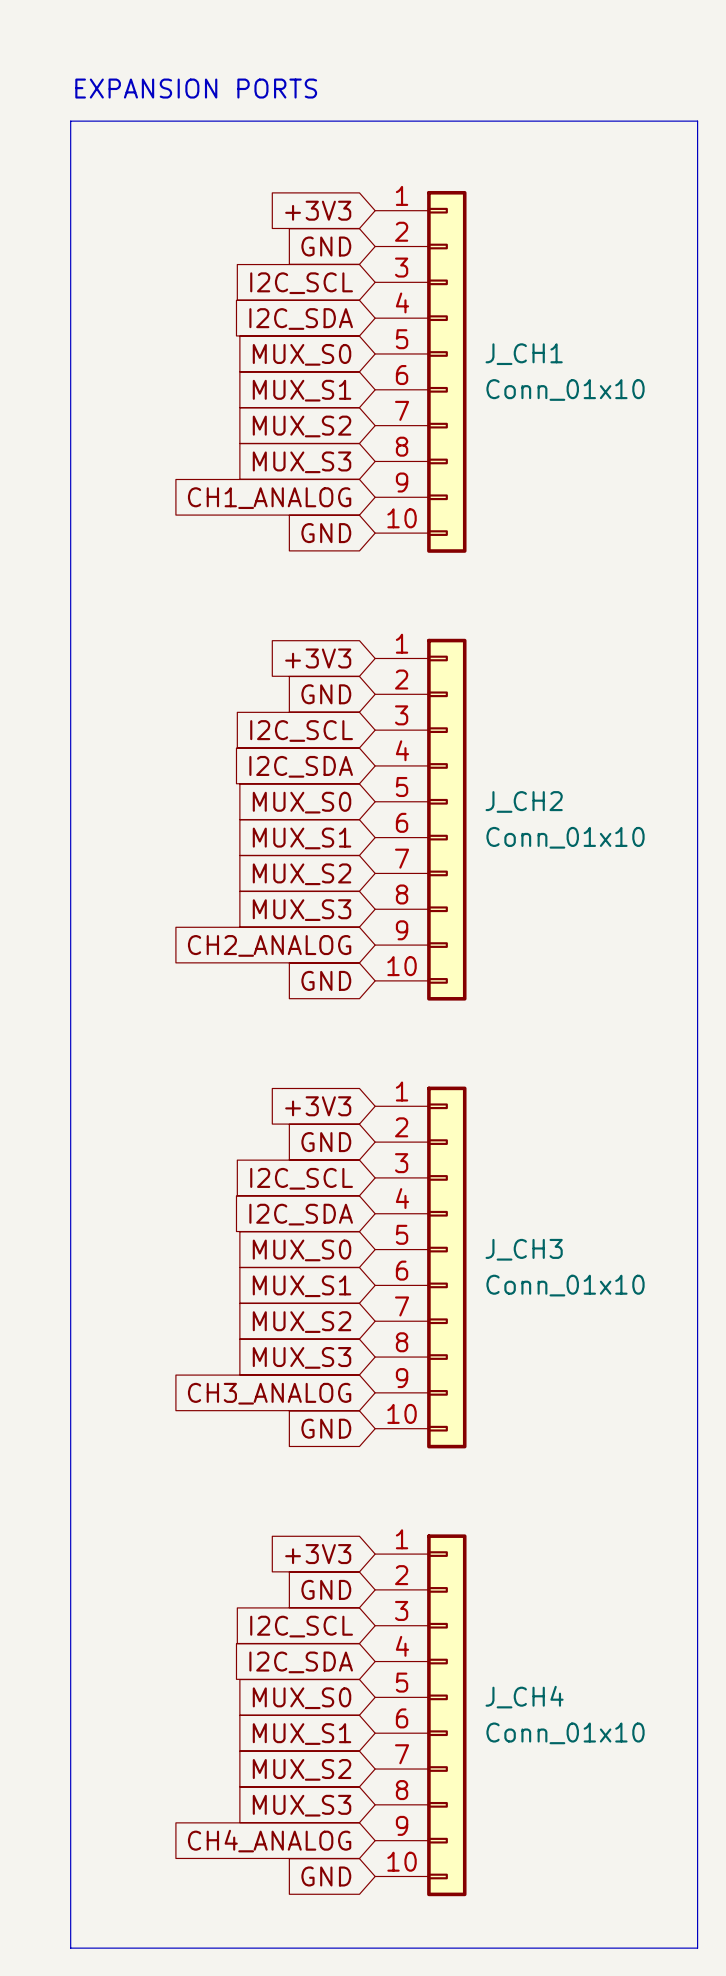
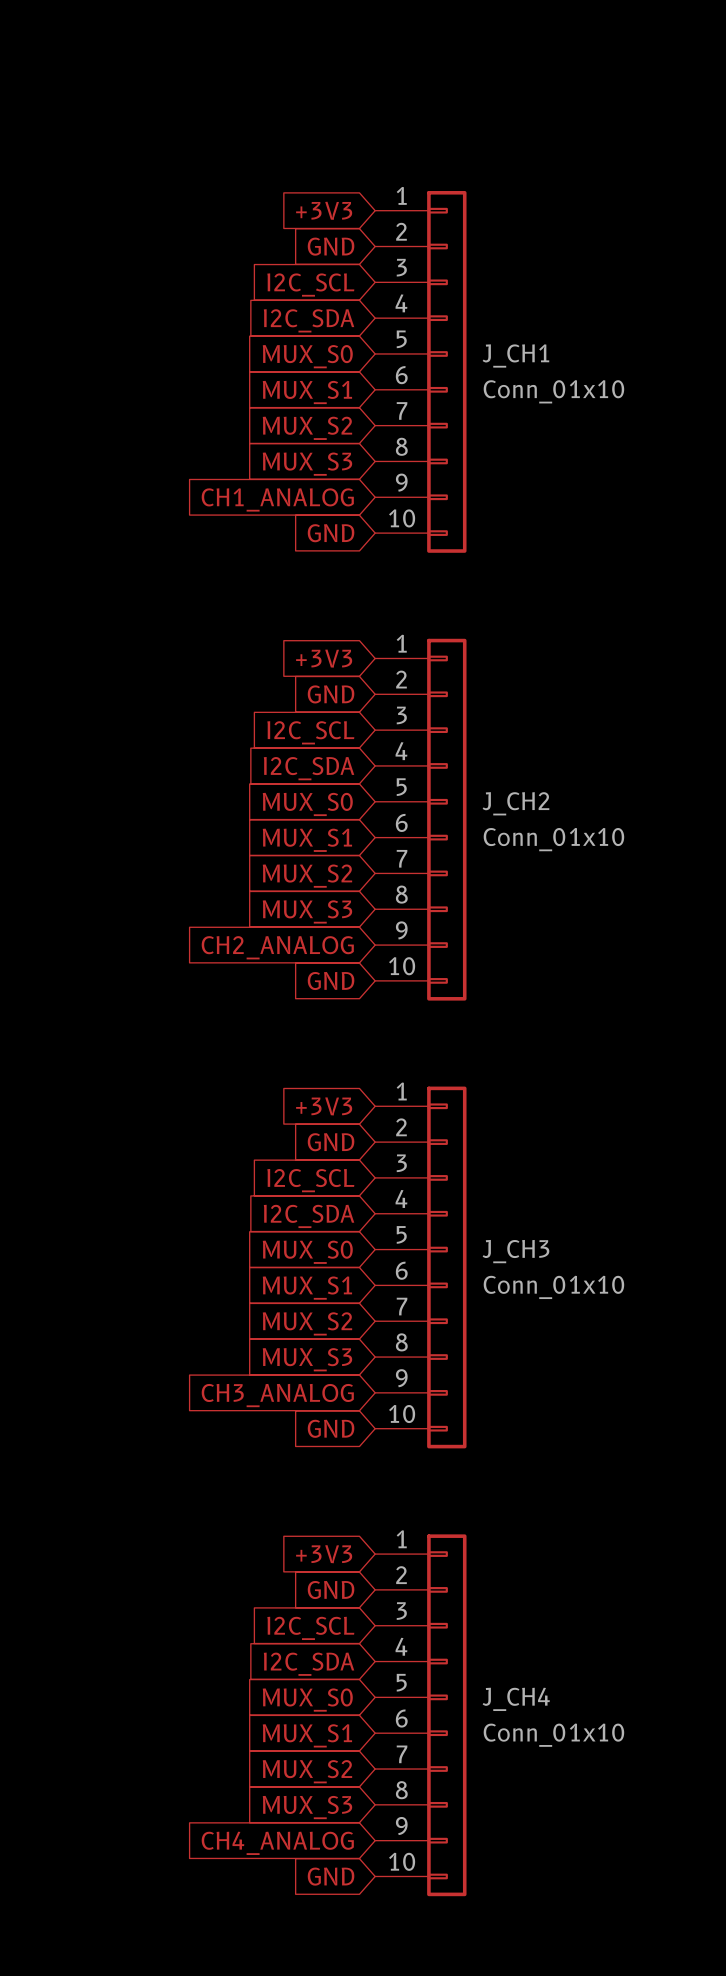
text: EXPANSION PORTS (196, 88) -> none
line: (70, 121) (697, 121) (697, 1948) (70, 1948) (70, 121) -> none

